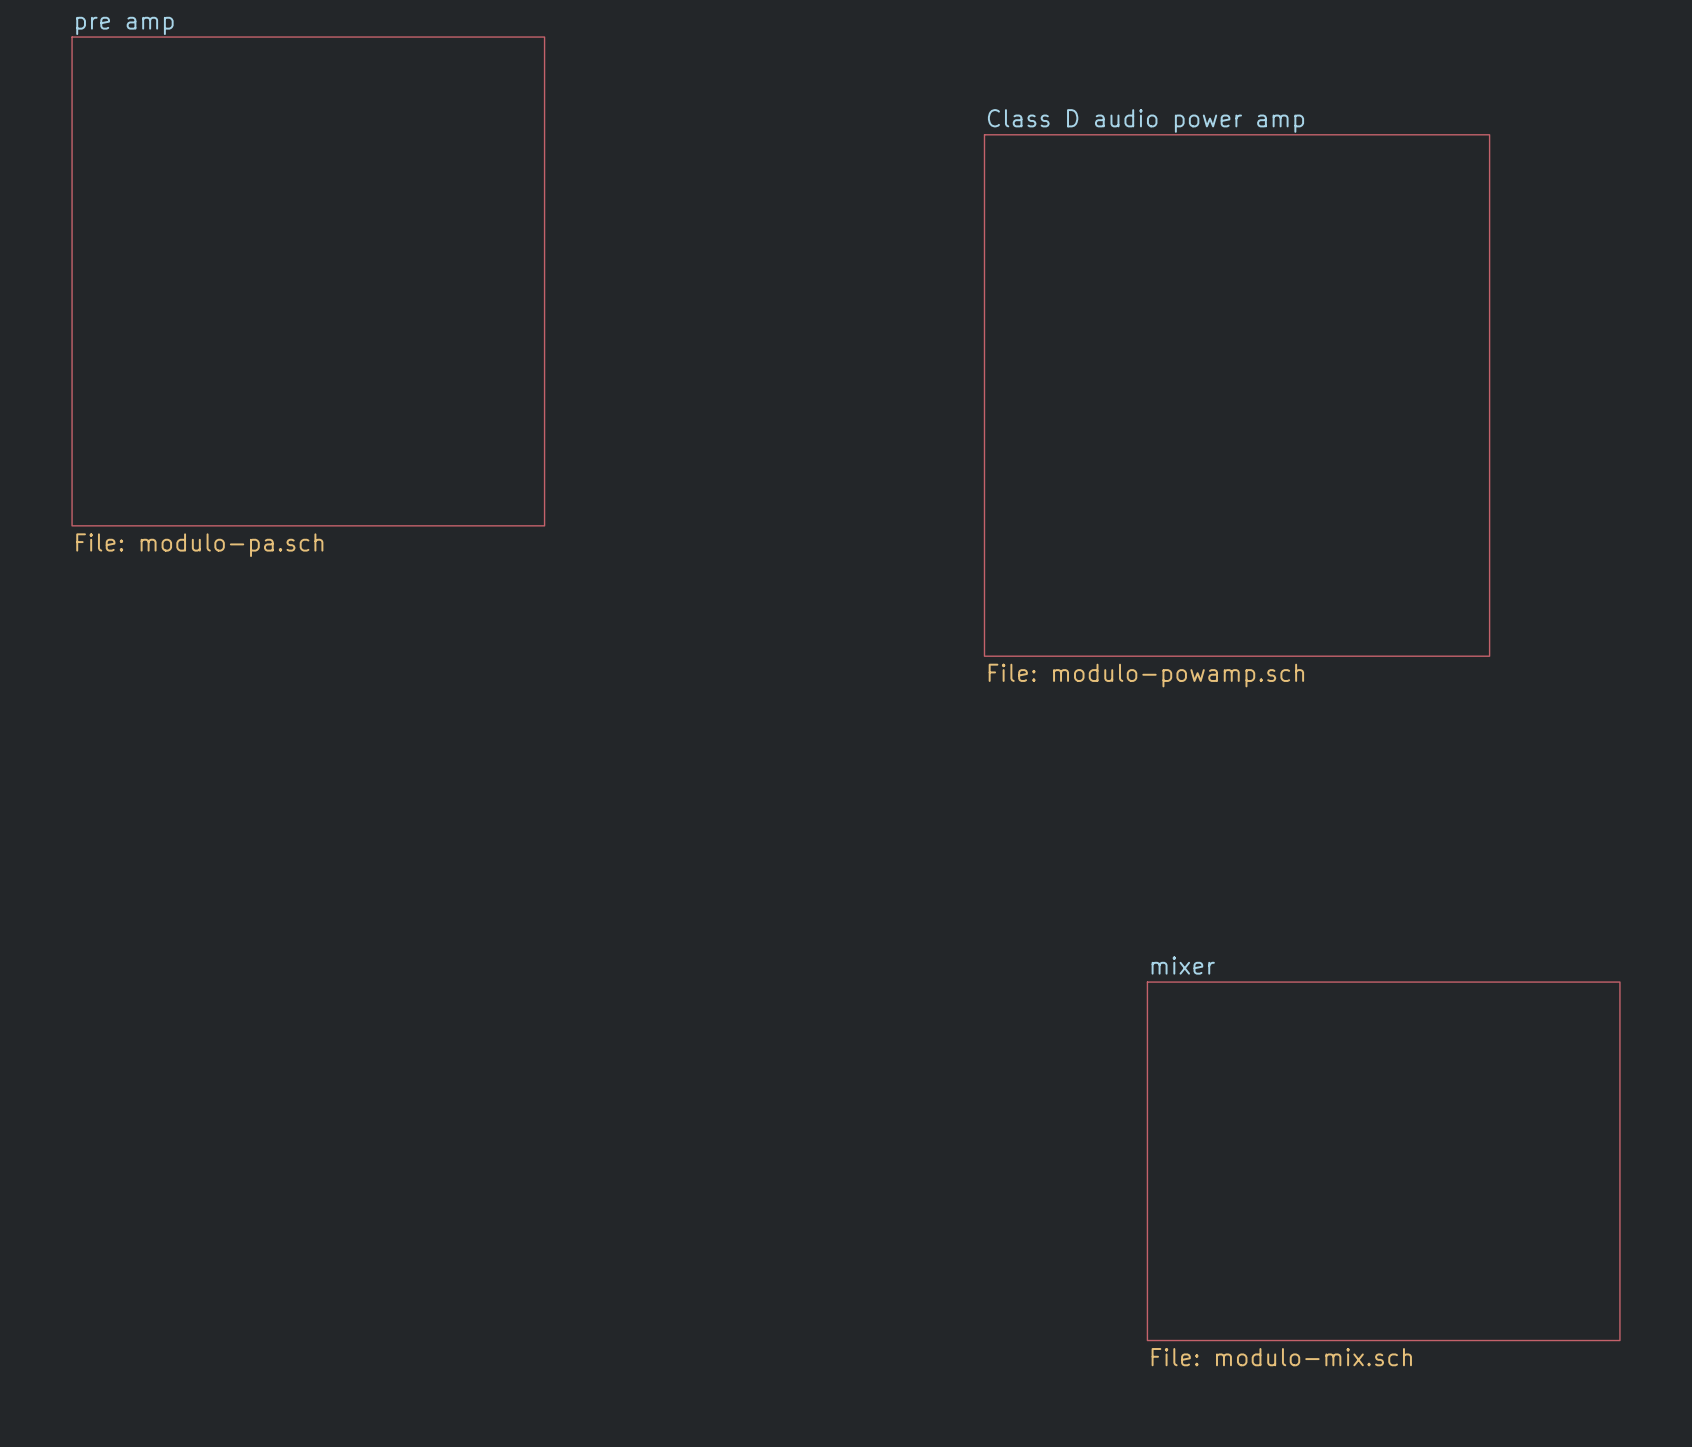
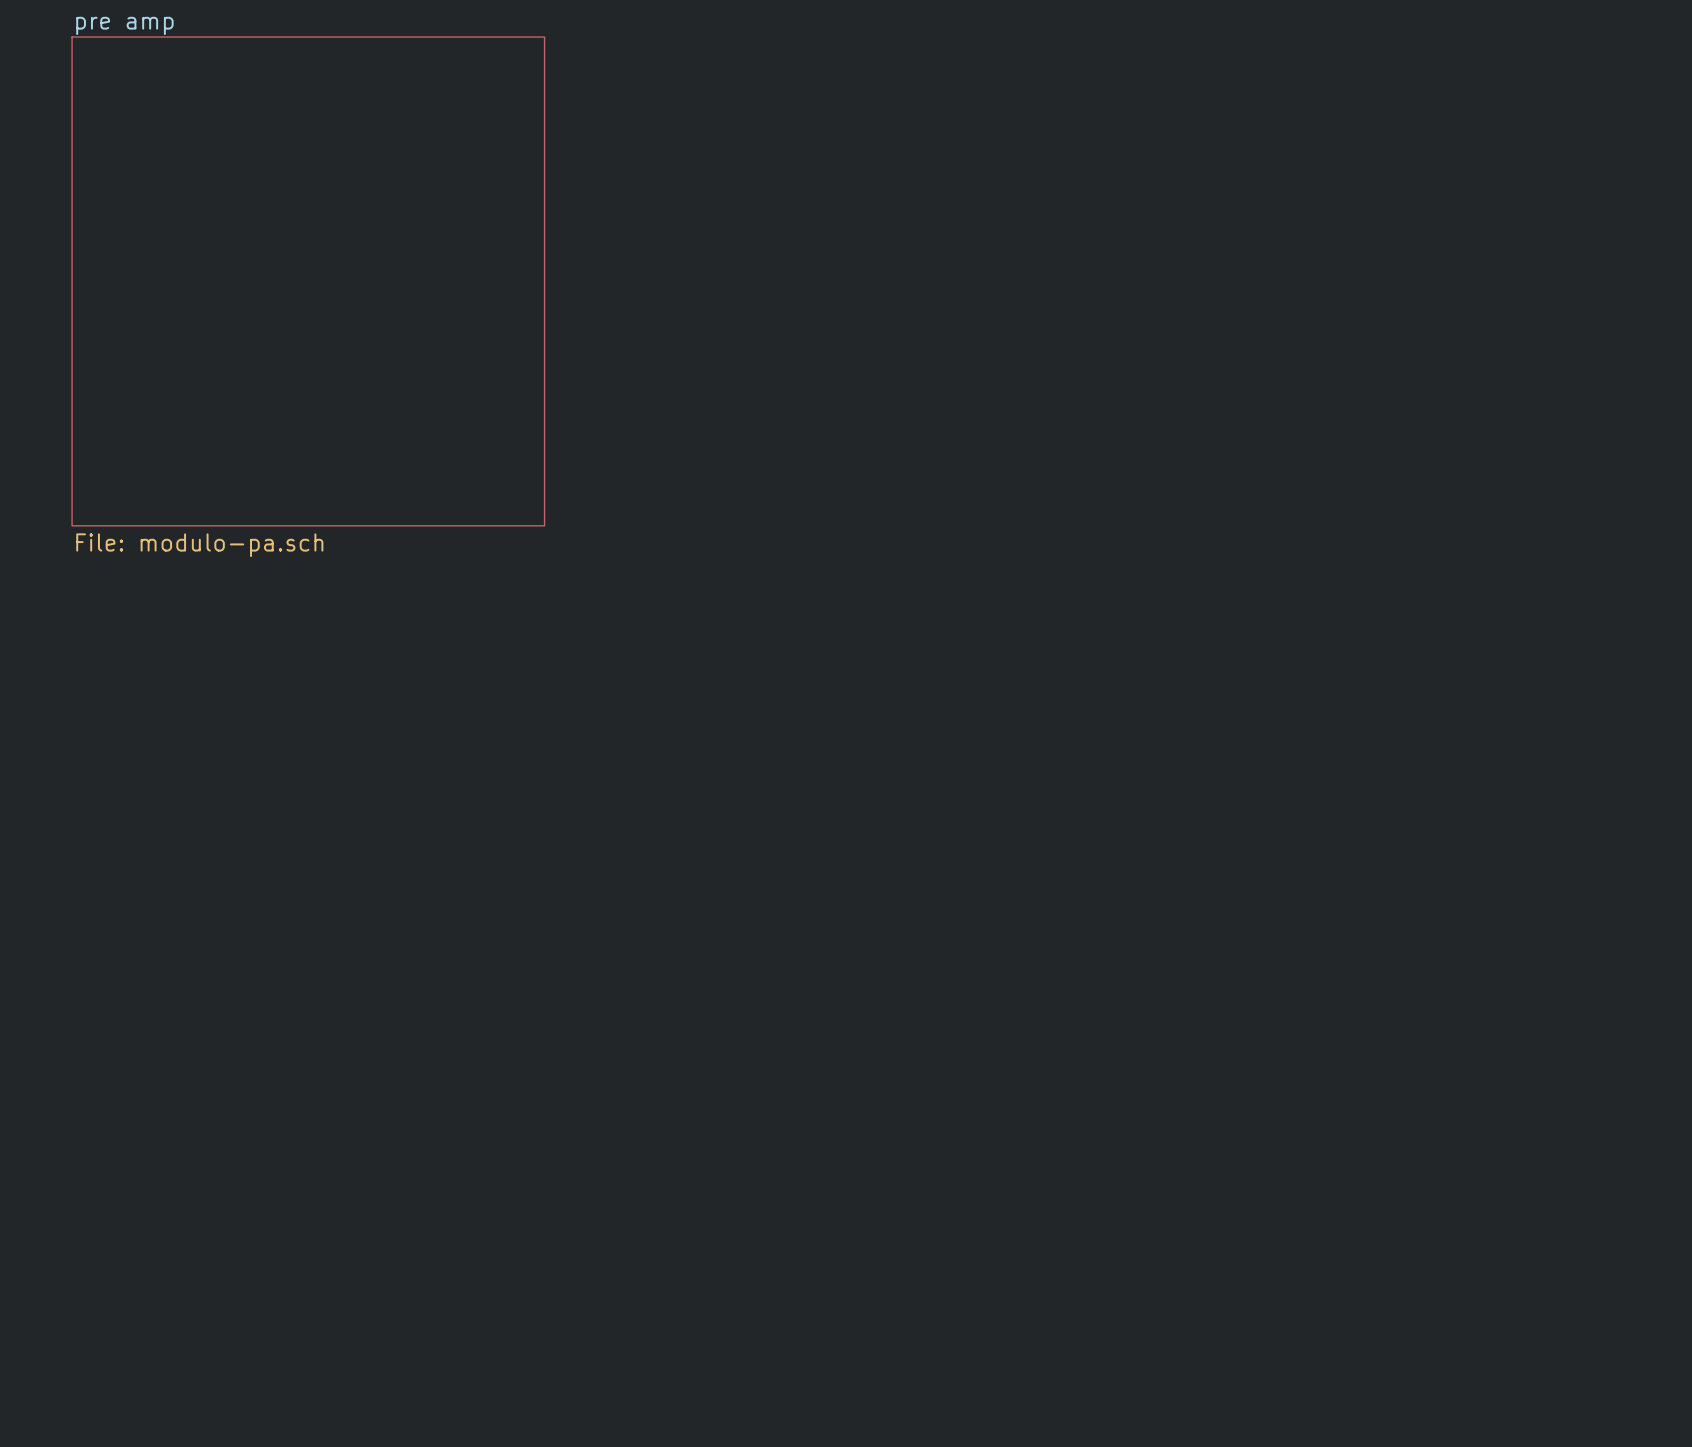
sheet Class D audio power amp: File: modulo-powamp.sch (1237, 395) -> none
sheet mixer: File: modulo-mix.sch (1383, 1161) -> none

